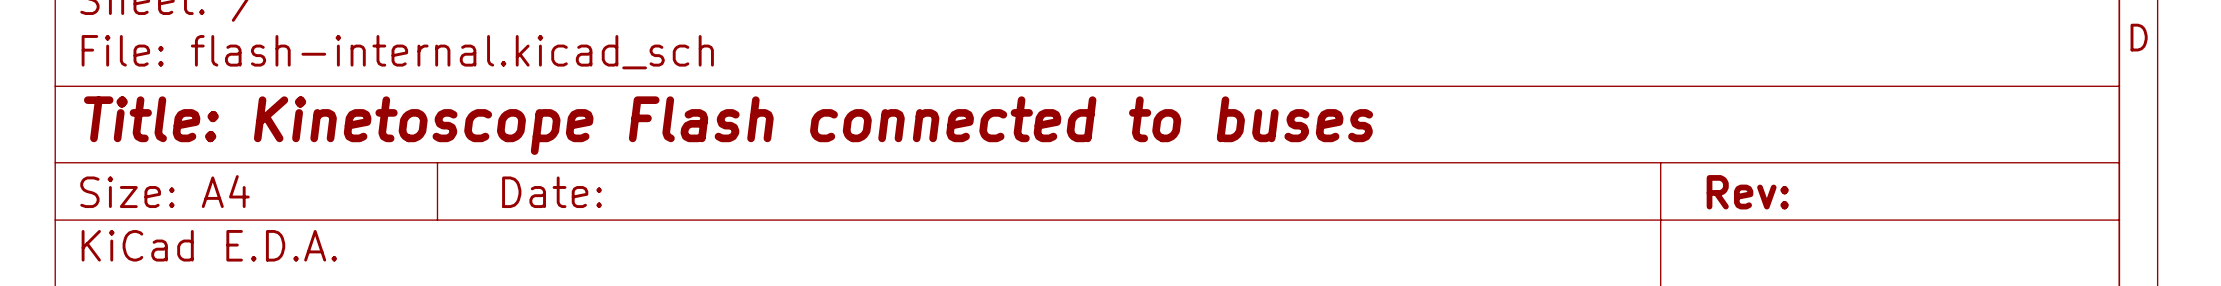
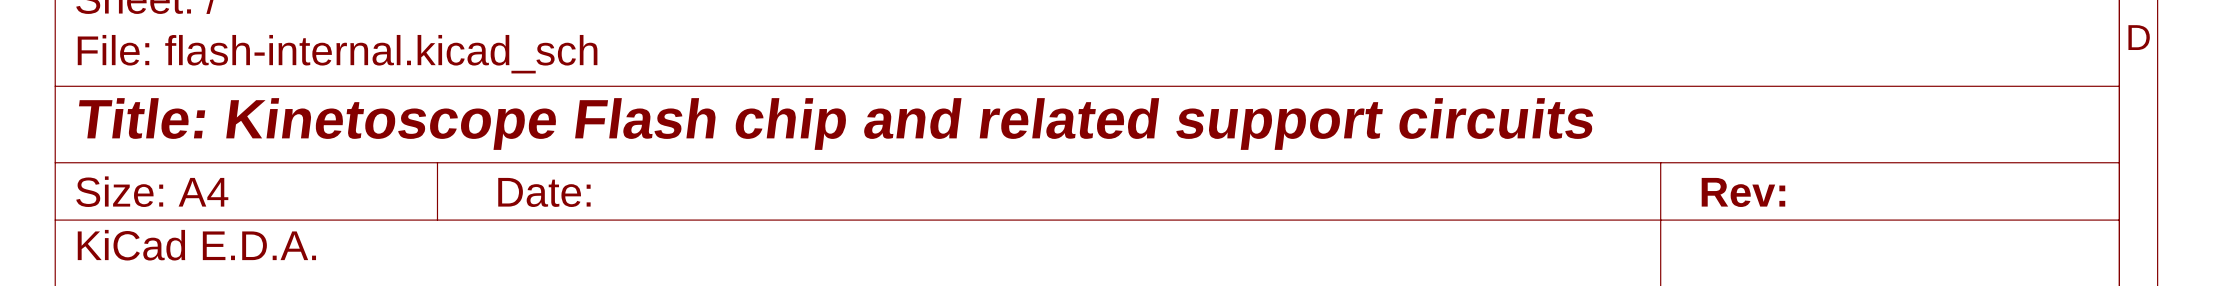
title block: Title: Kinetoscope Flash connected to buses (728, 125) -> Title: Kinetoscope Flash chip and related support circuits (836, 124)

